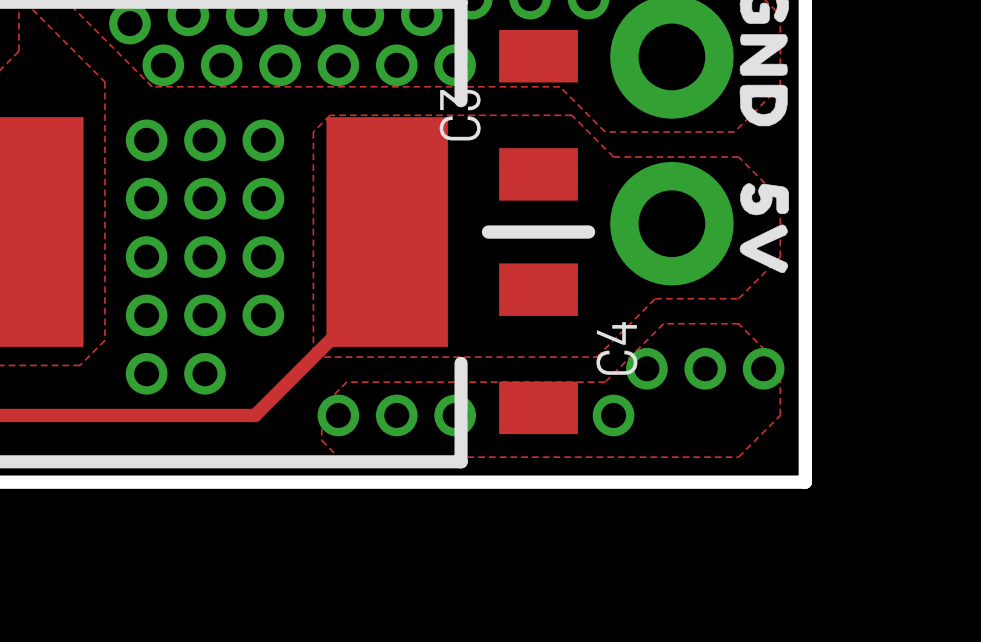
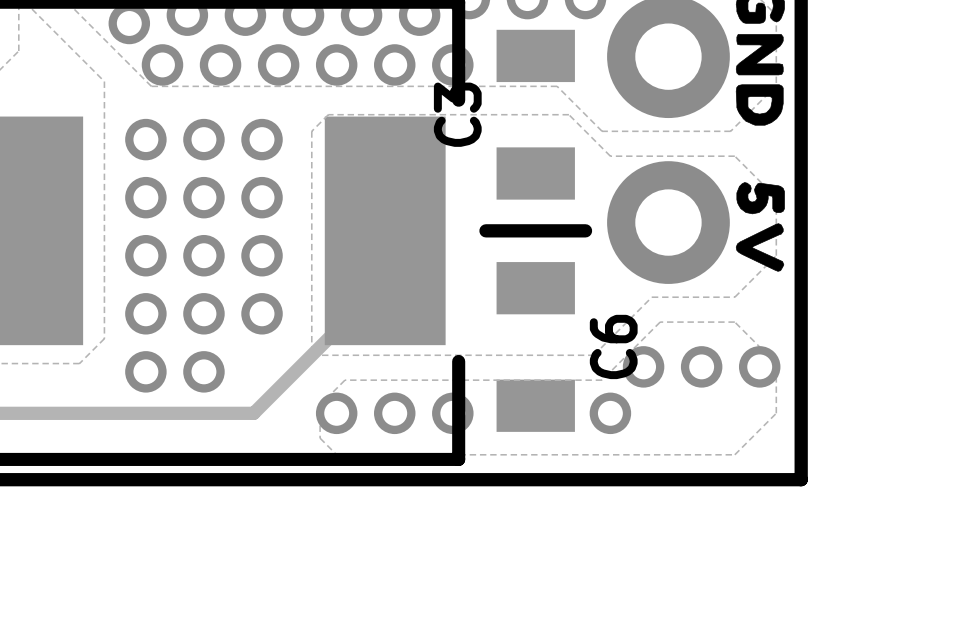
C4 name: C4 (616, 348) -> C6 (613, 346)

